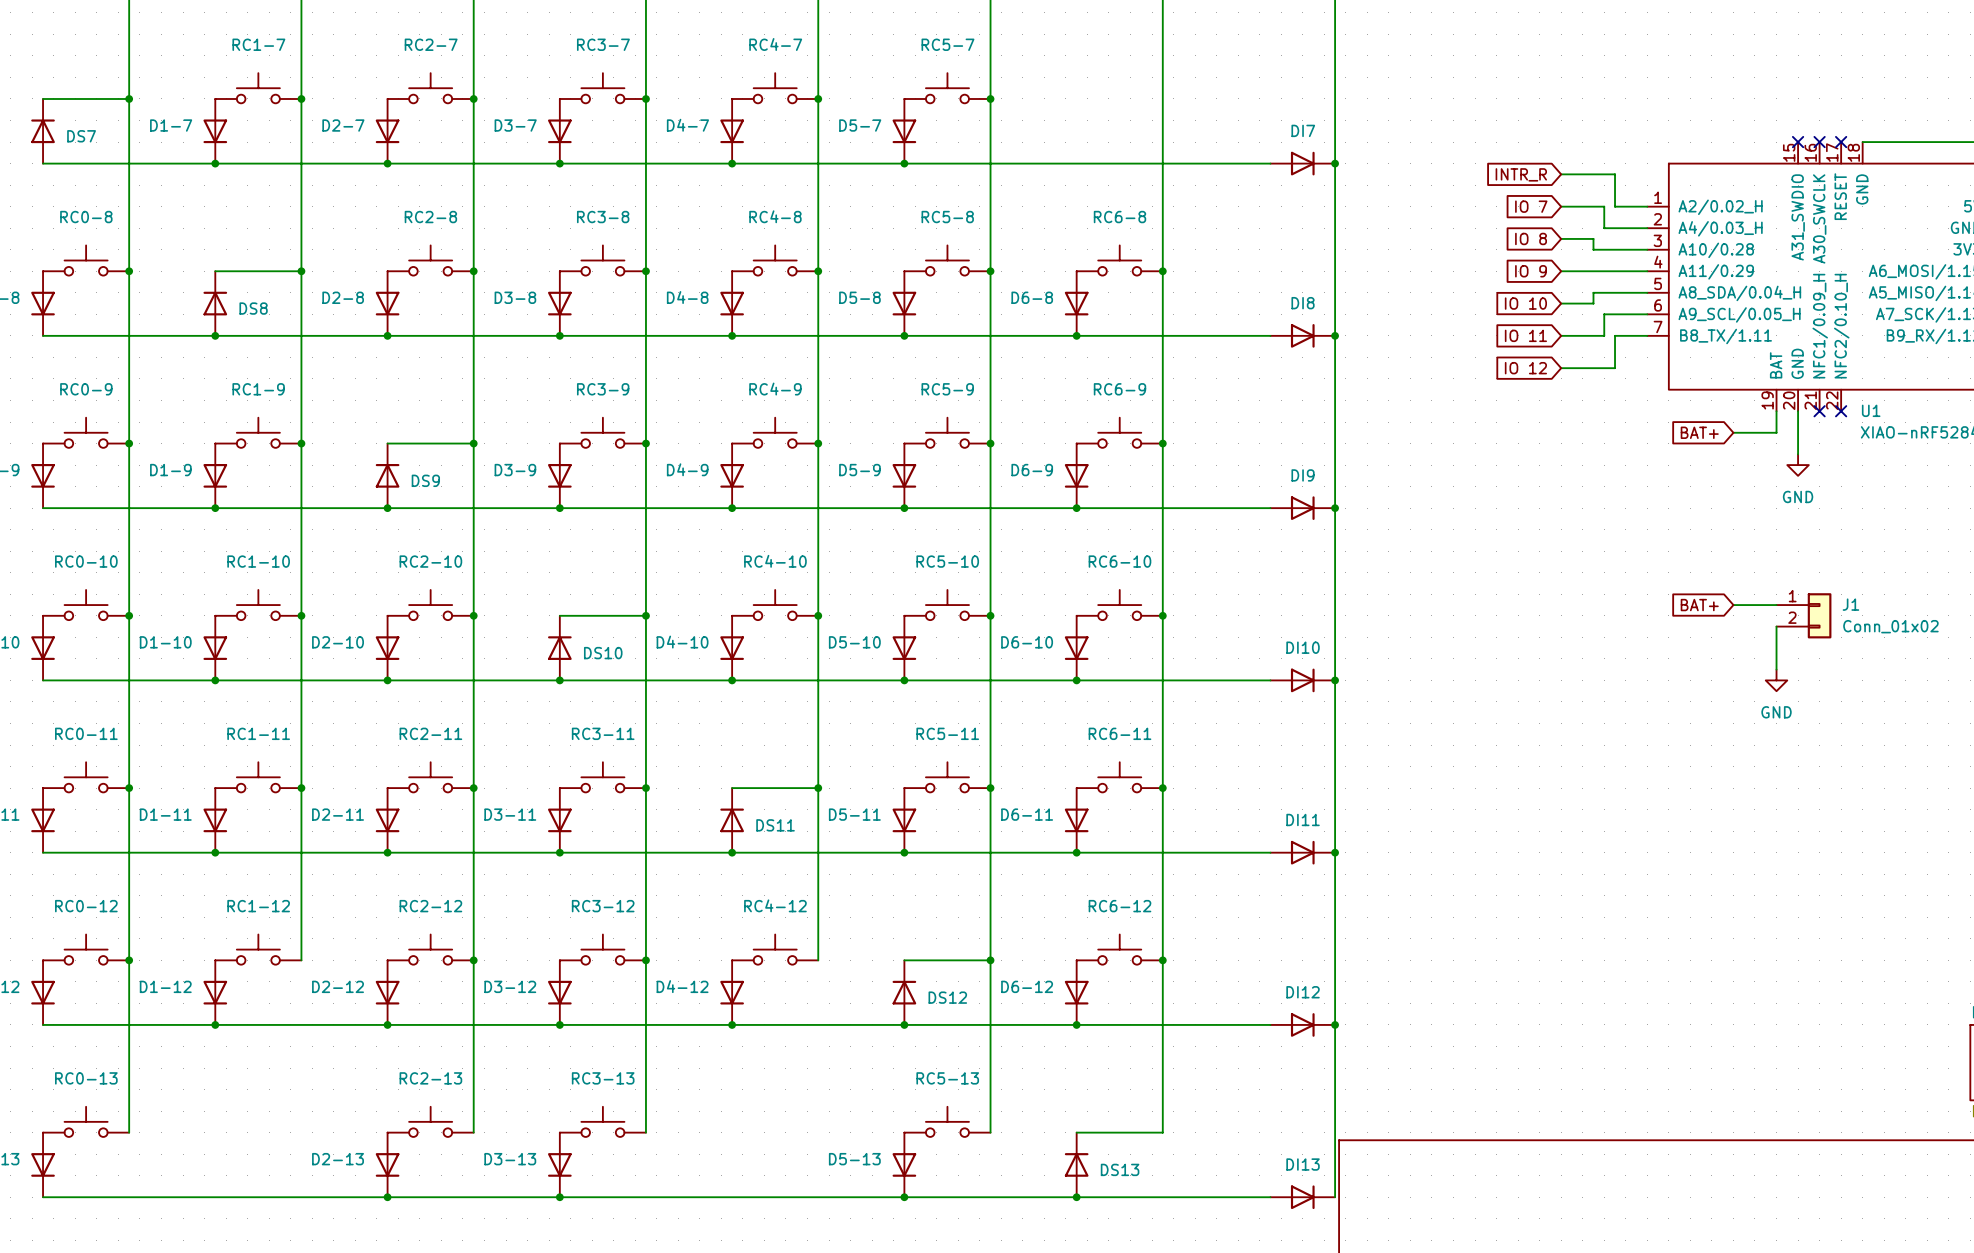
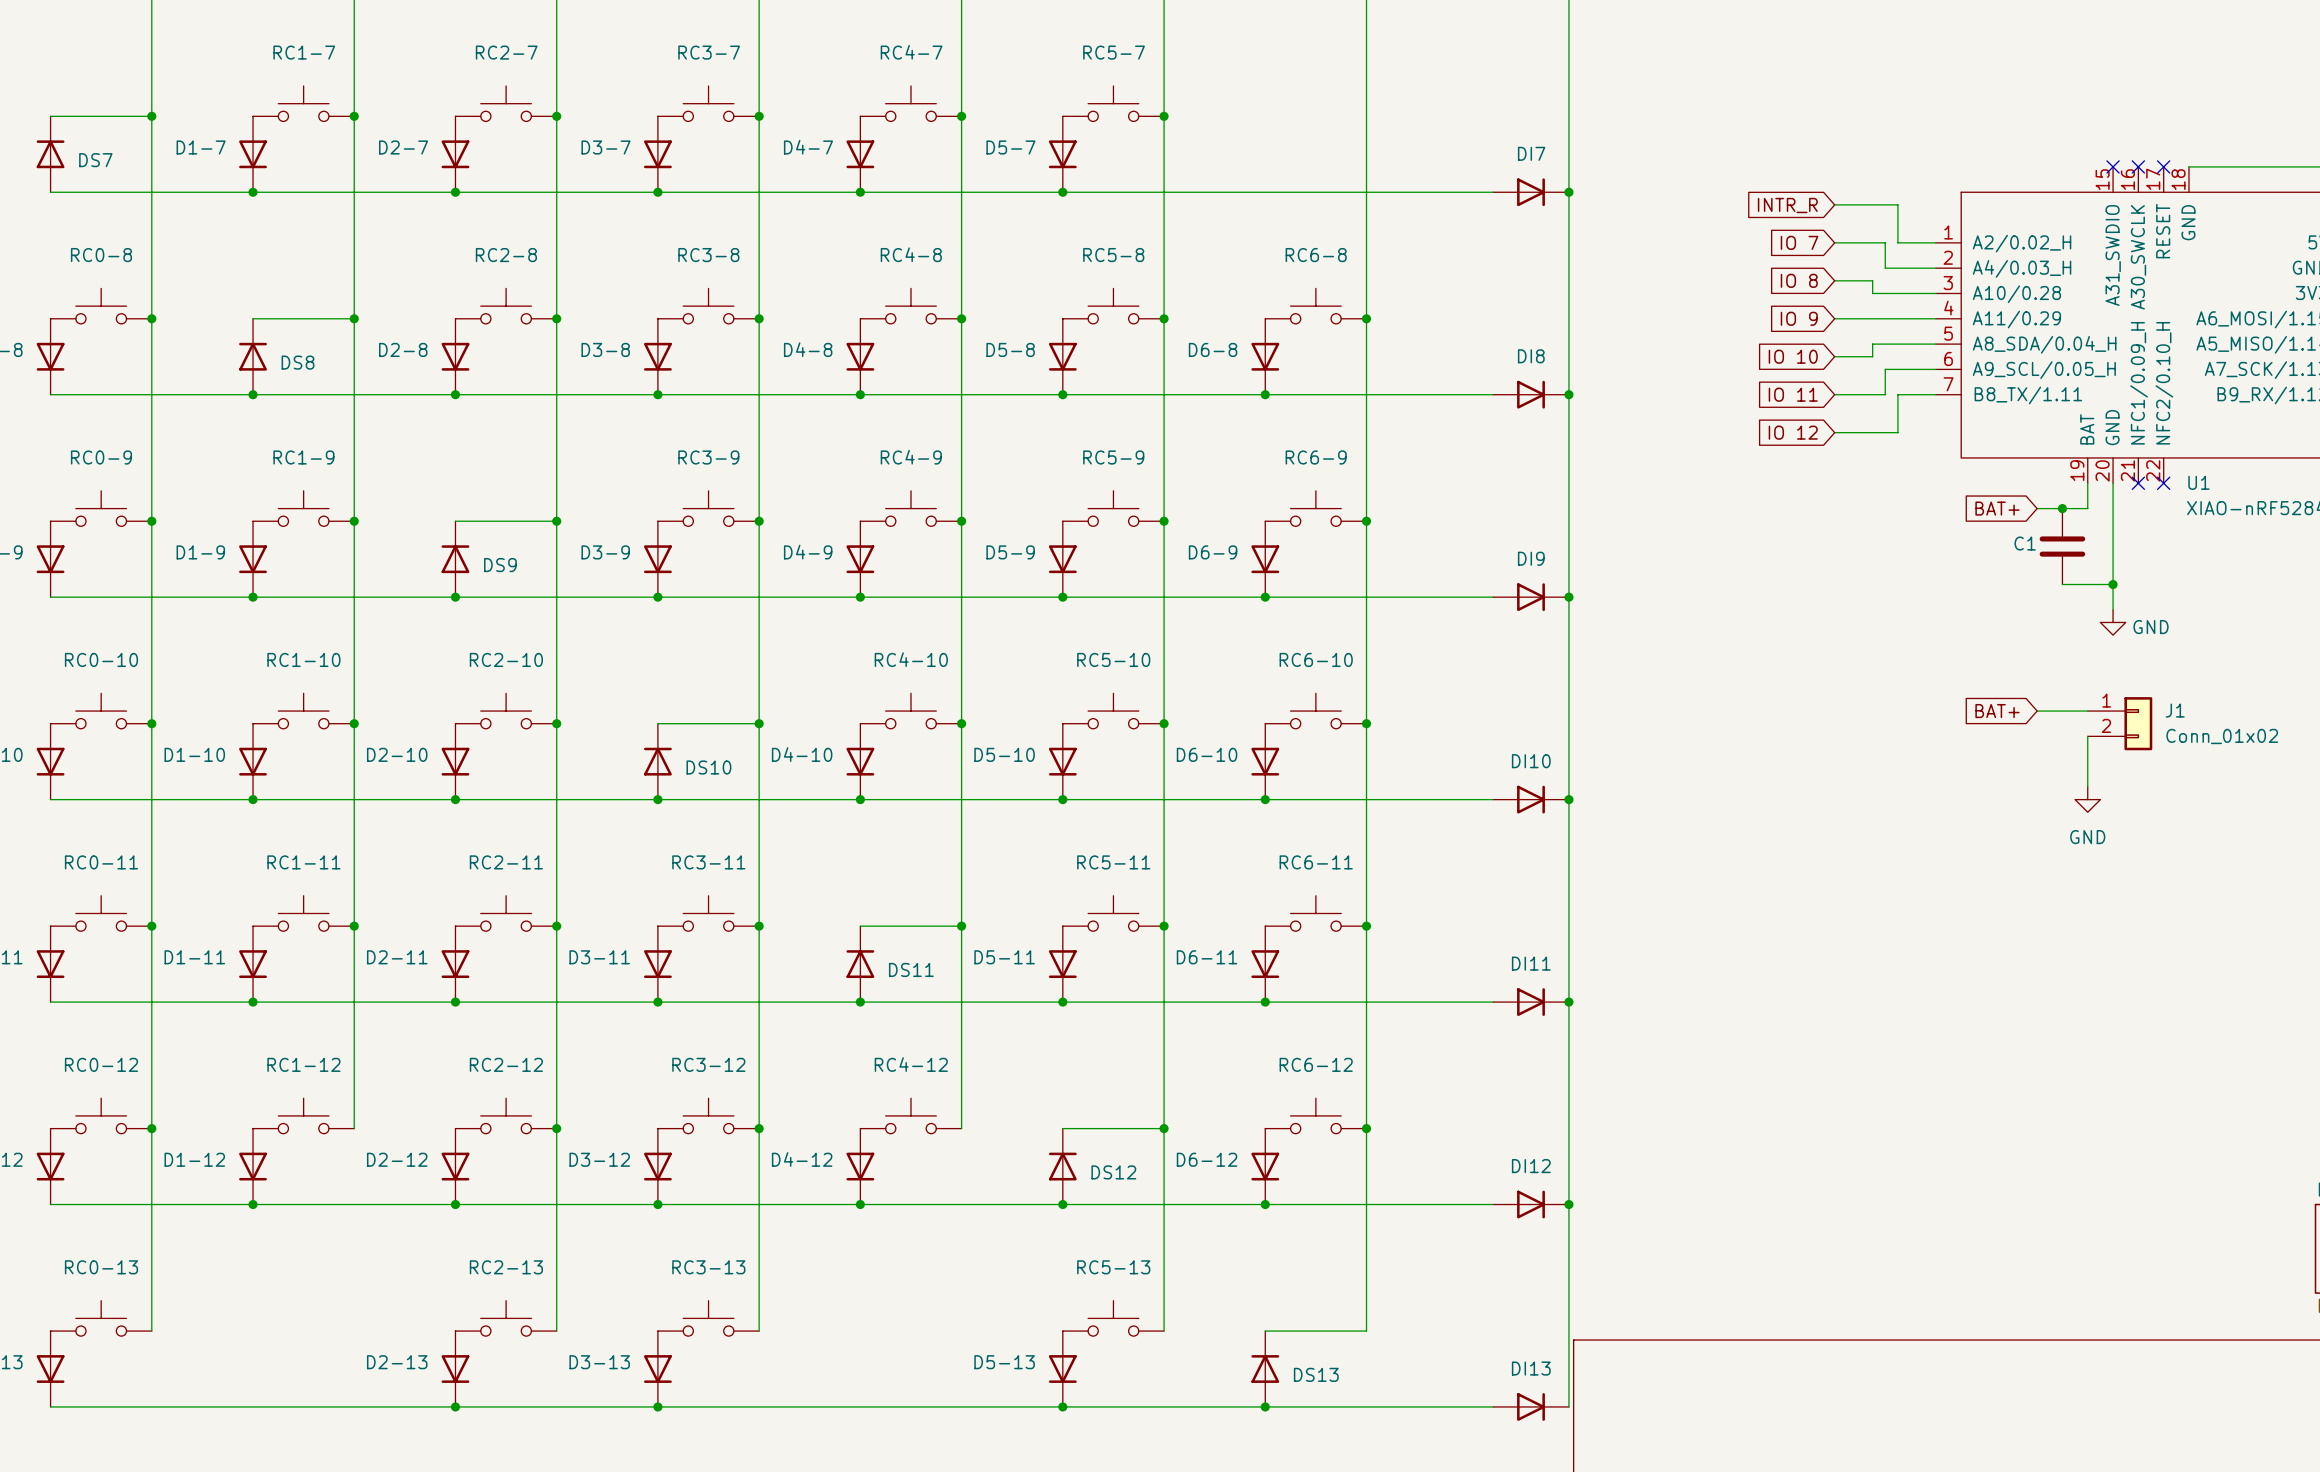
junction: none -> (2062, 508)
wire: none -> (2113, 533) (2113, 609)
C1: none -> (2062, 546)
power symbol position: GND (1798, 465) -> GND (2113, 622)
power symbol text position: GND (1798, 496) -> GND (2151, 627)
wire: none -> (2062, 584) (2113, 584)
junction: none -> (2113, 584)

